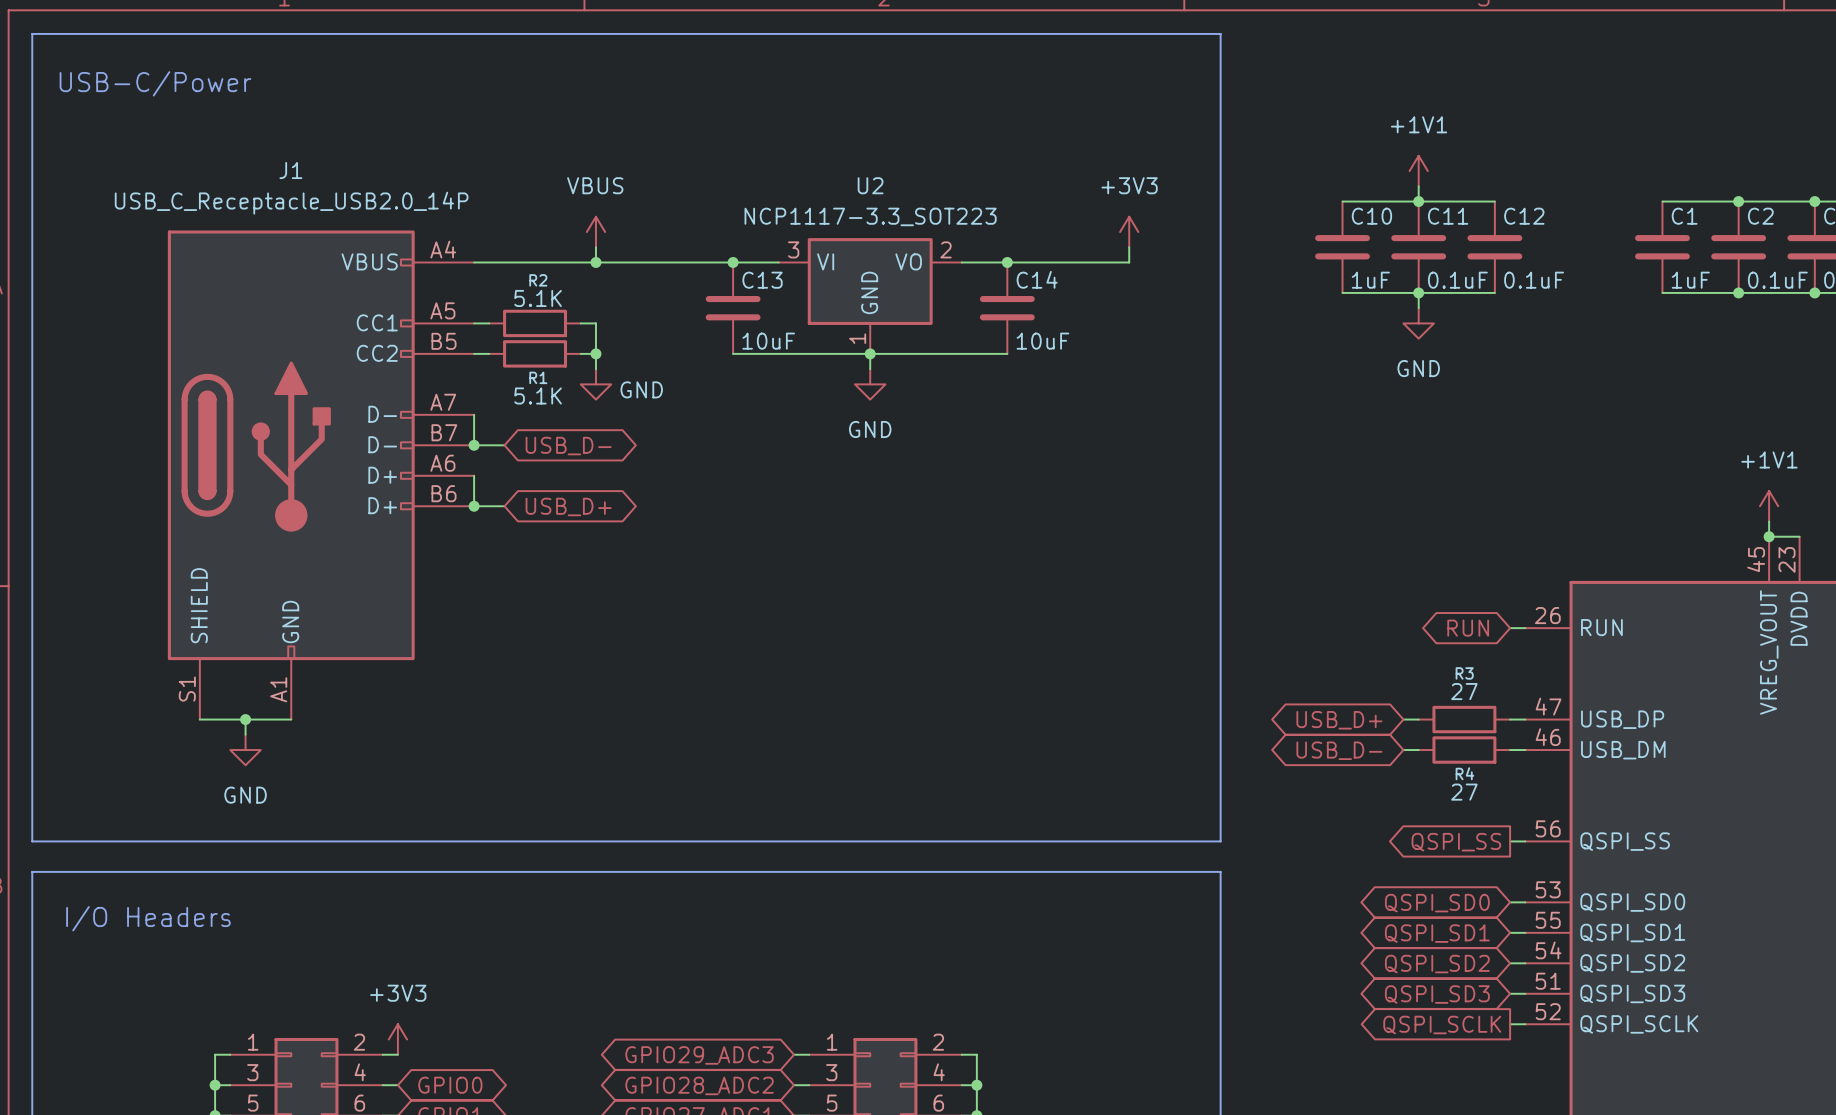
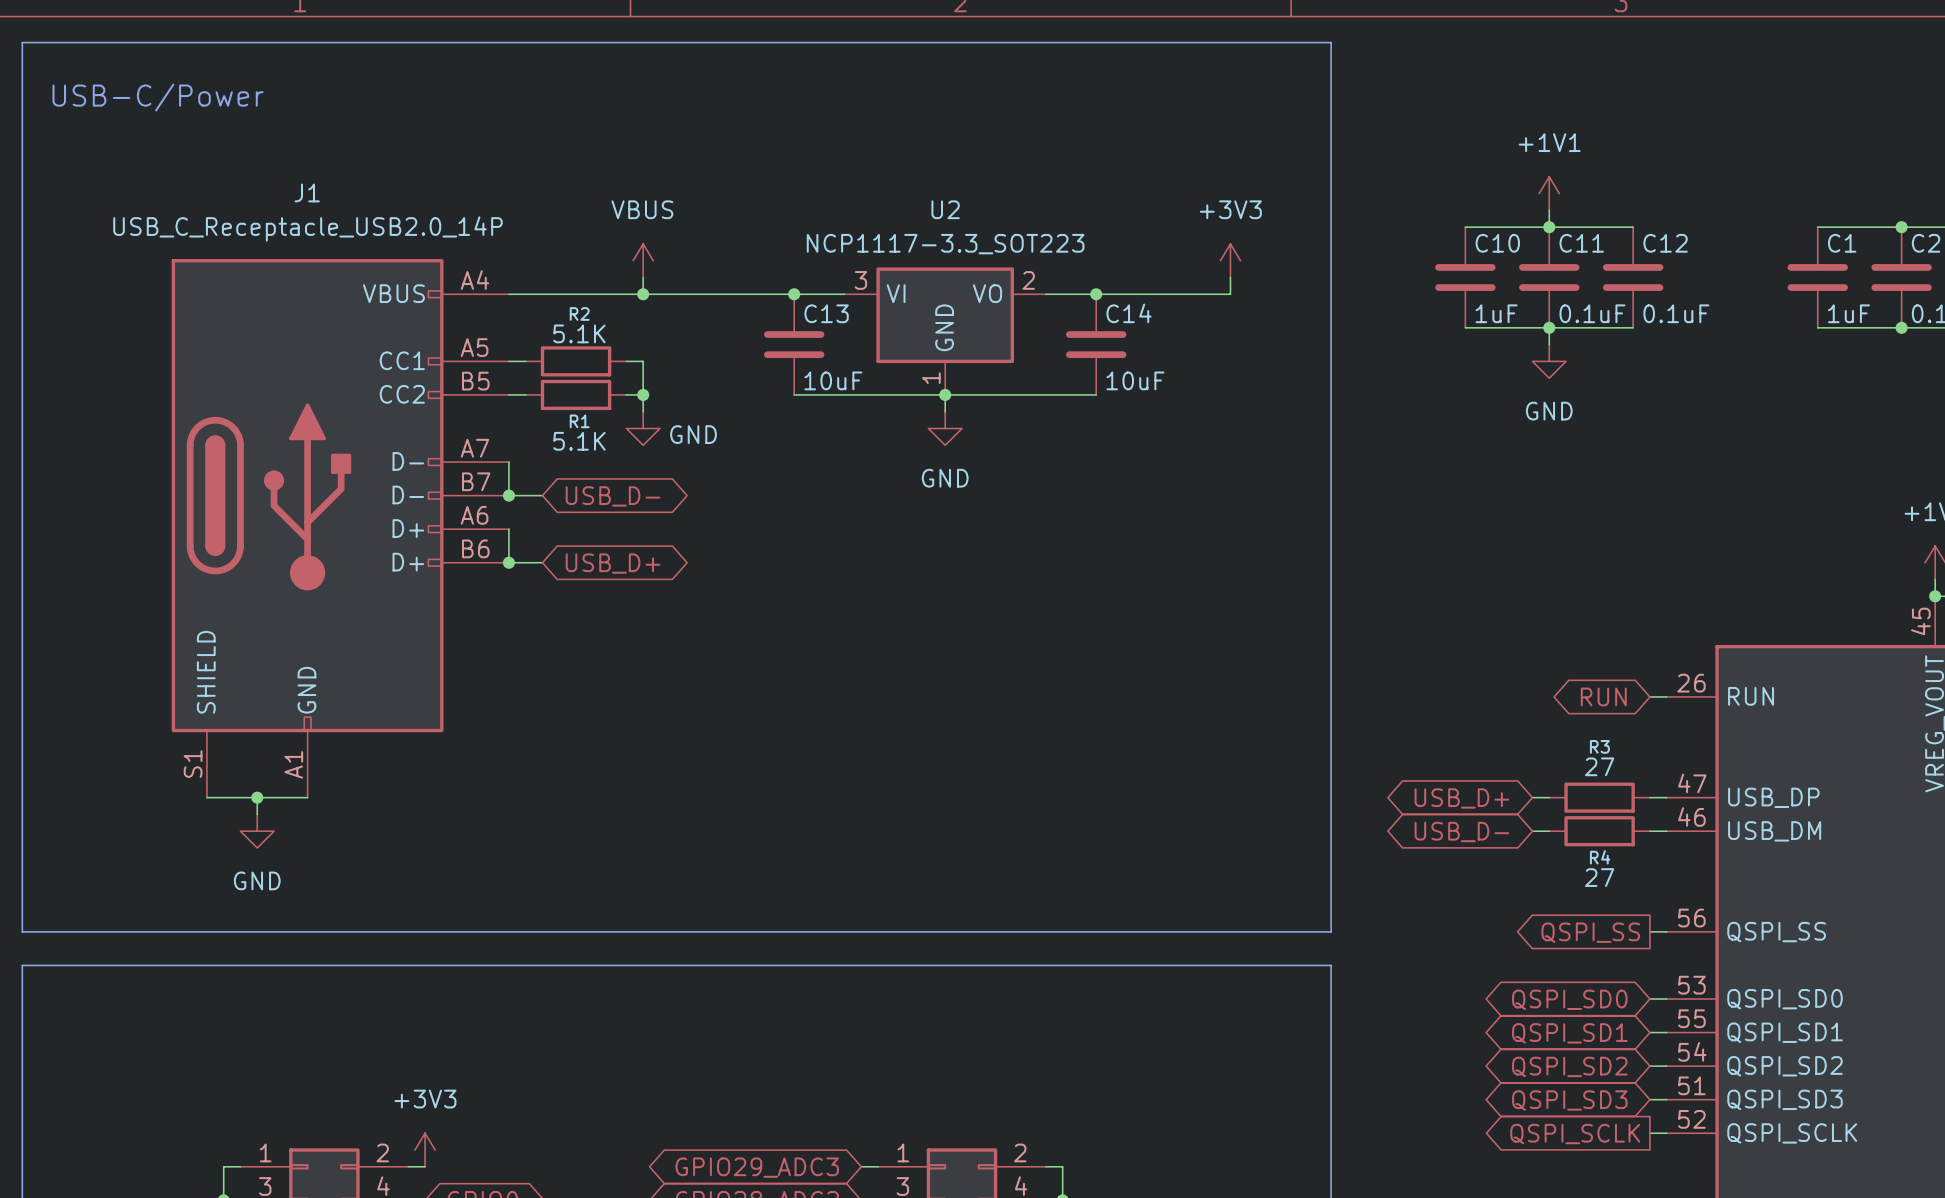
text: I/O Headers (148, 918) -> none

